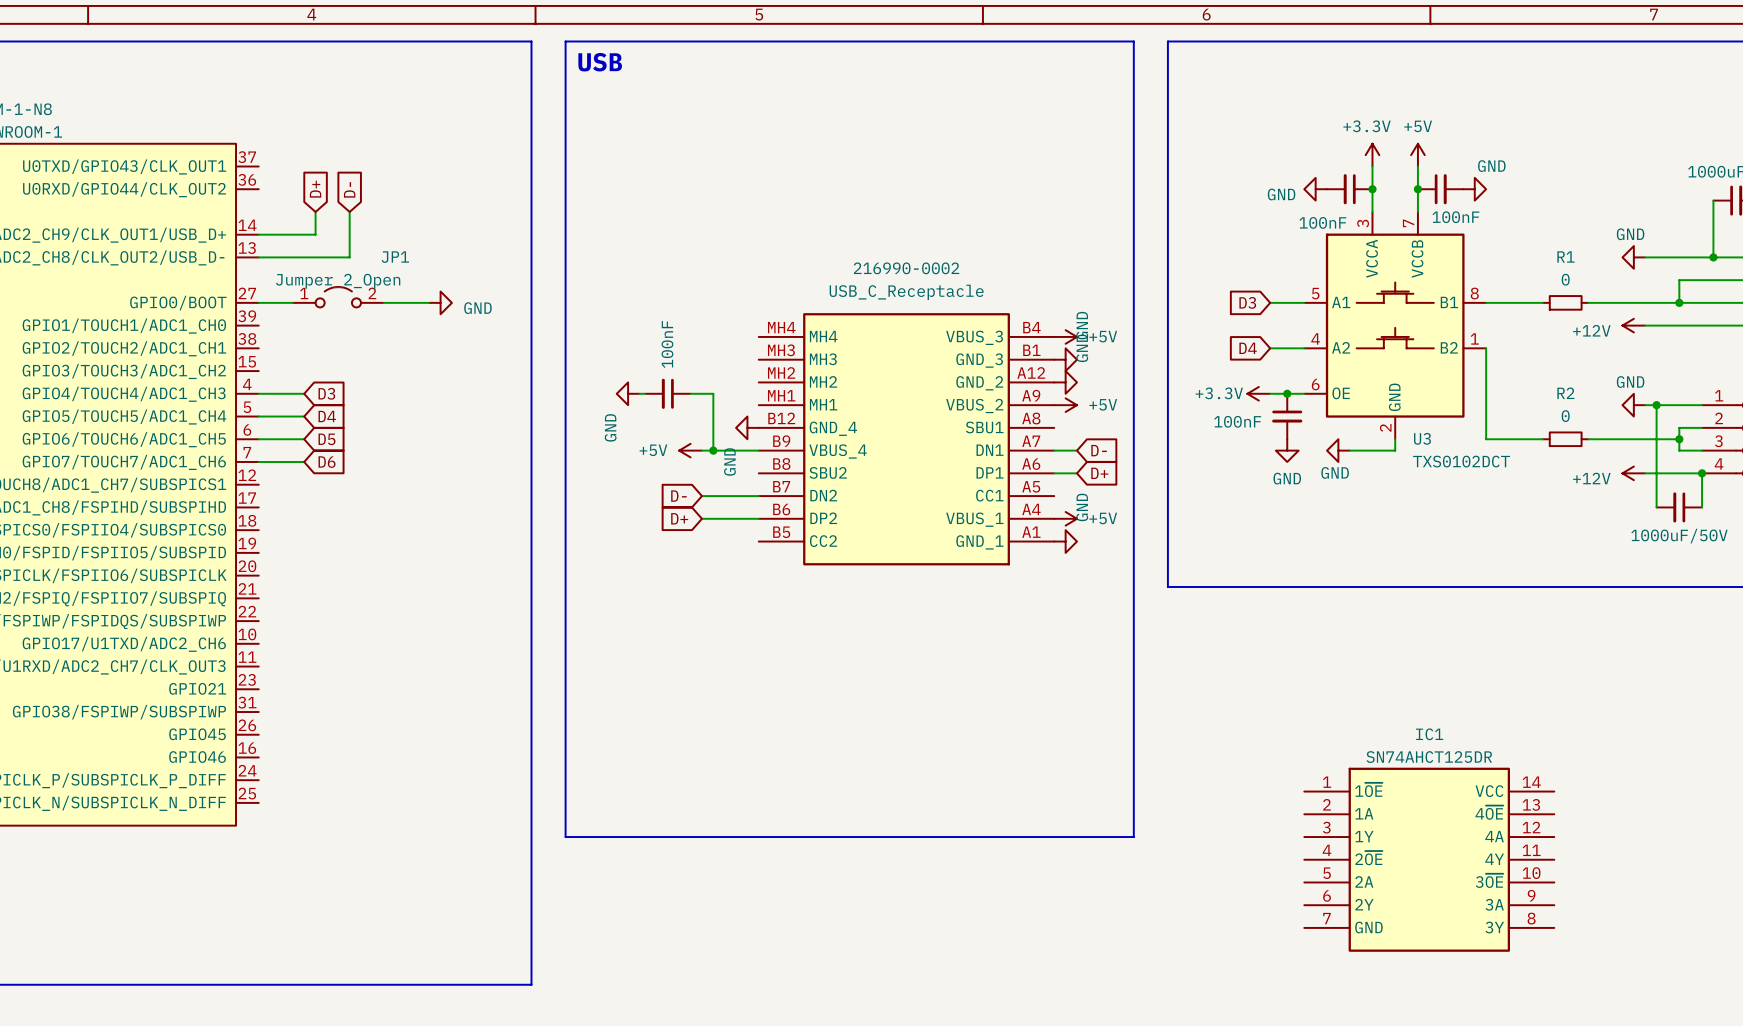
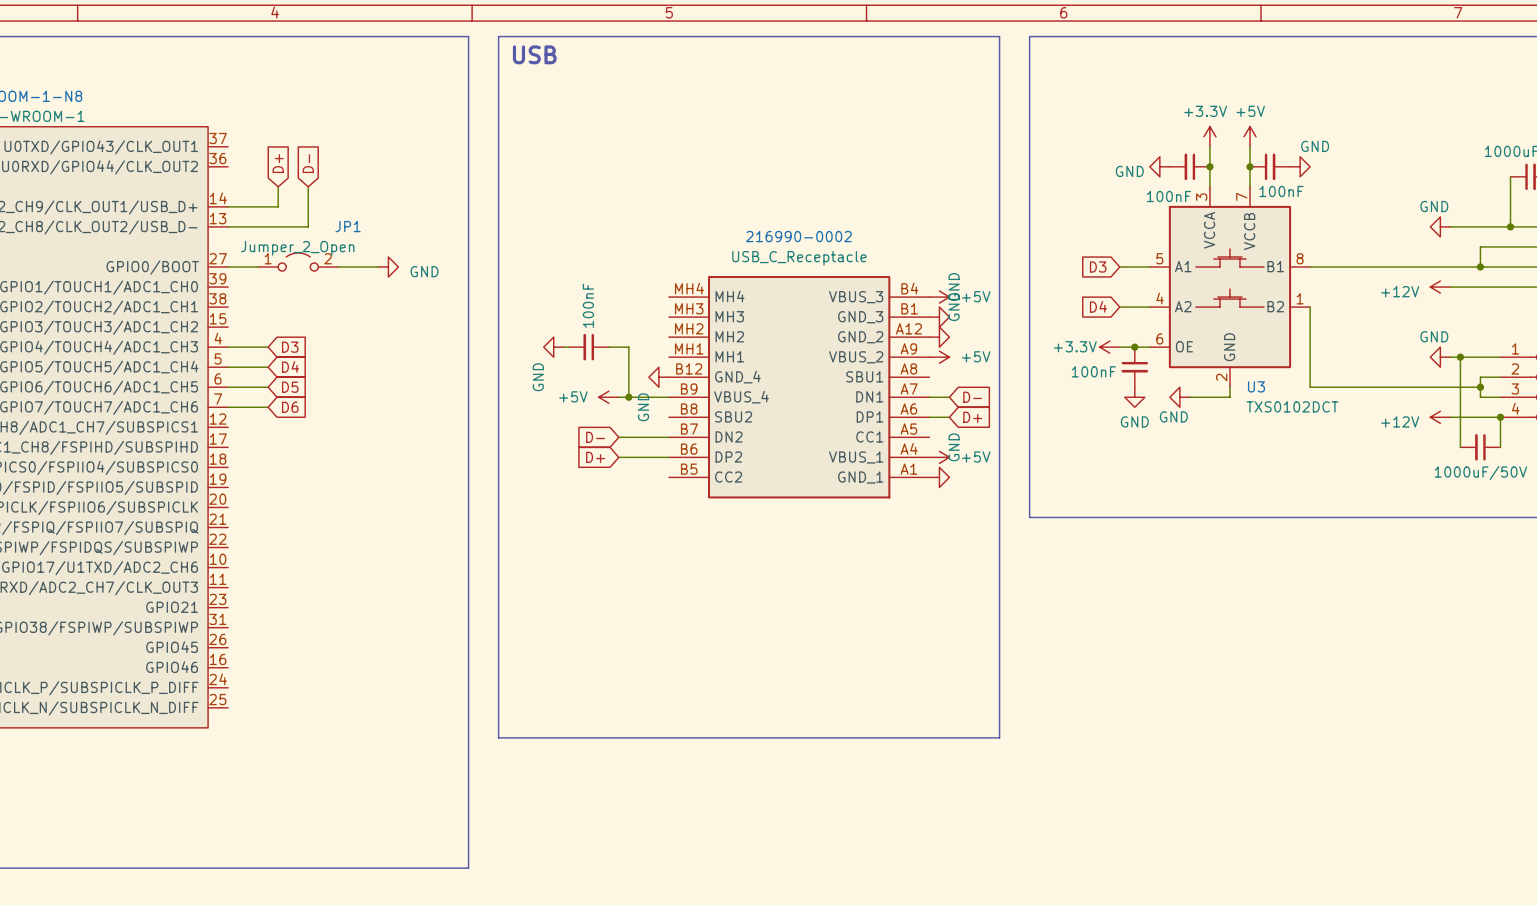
wire: none -> (1360, 267) (1400, 267)
R1: 0 (1565, 302) -> none
wire: none -> (1360, 387) (1400, 387)
R2: 0 (1565, 439) -> none
IC1: SN74AHCT125DR (1429, 859) -> none

